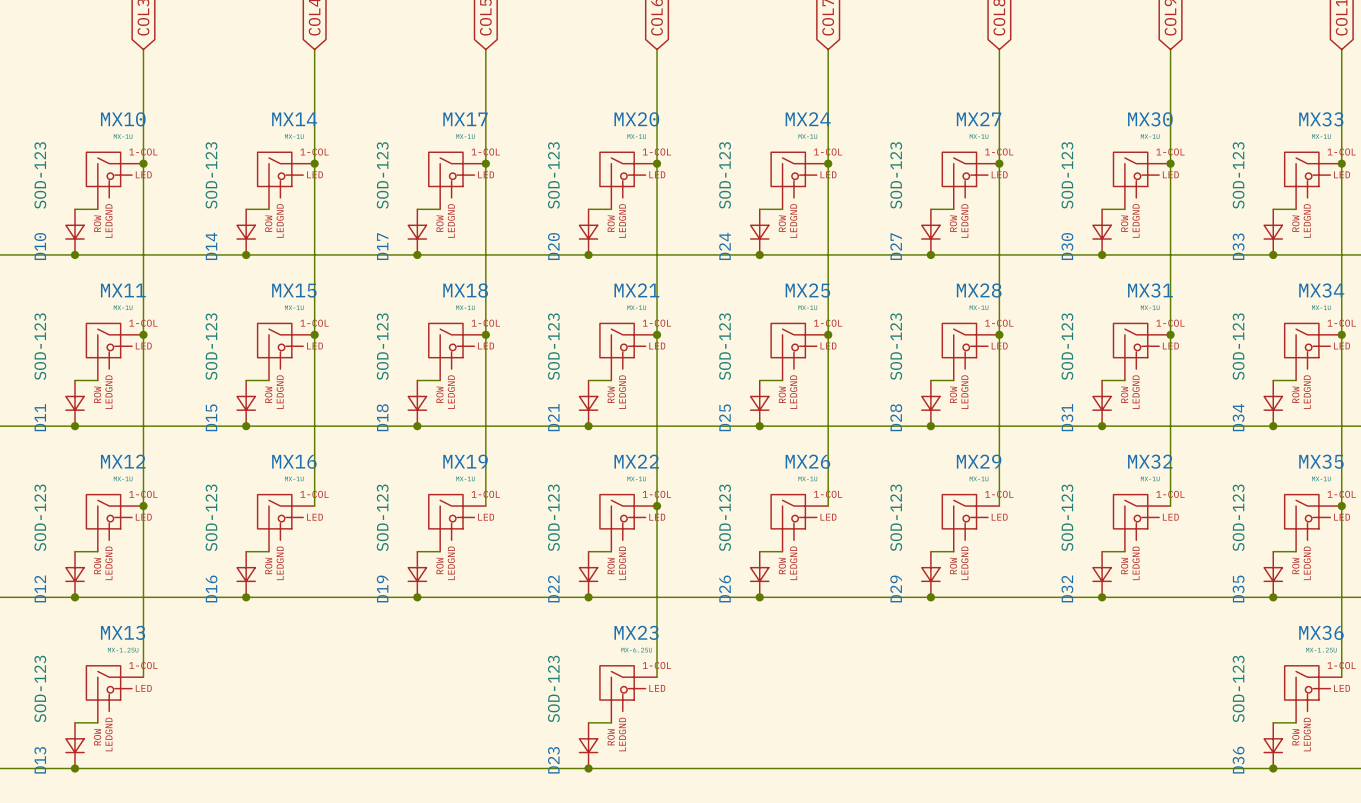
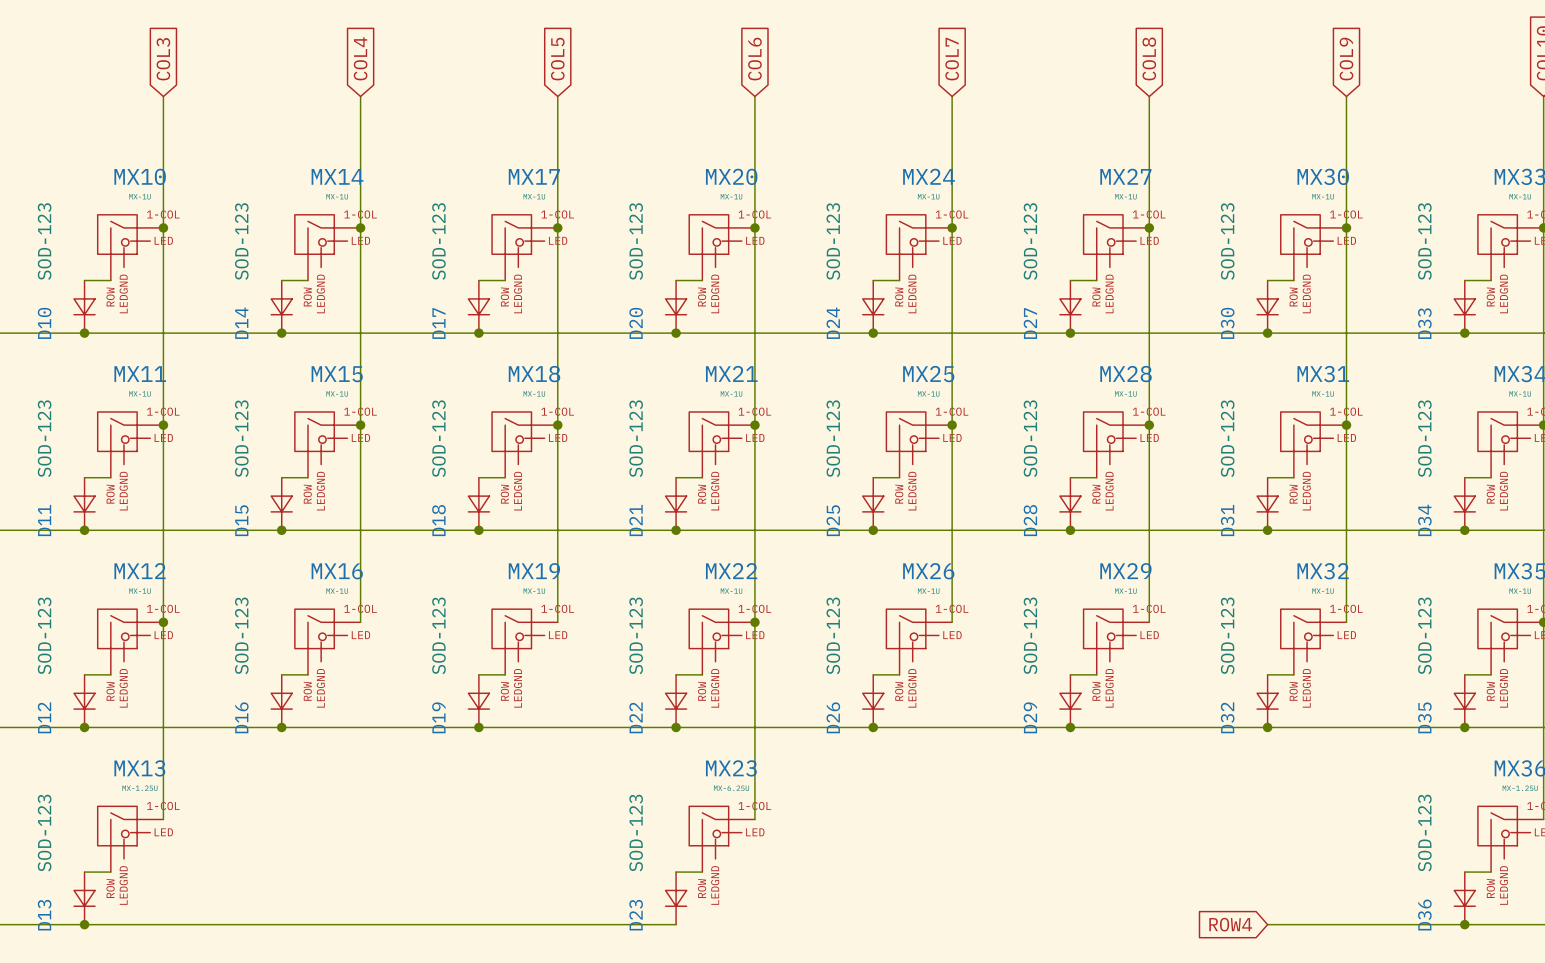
wire: (588, 768) (1102, 768) -> none
junction: (588, 768) -> none
global label: none -> ROW4 (1230, 924)

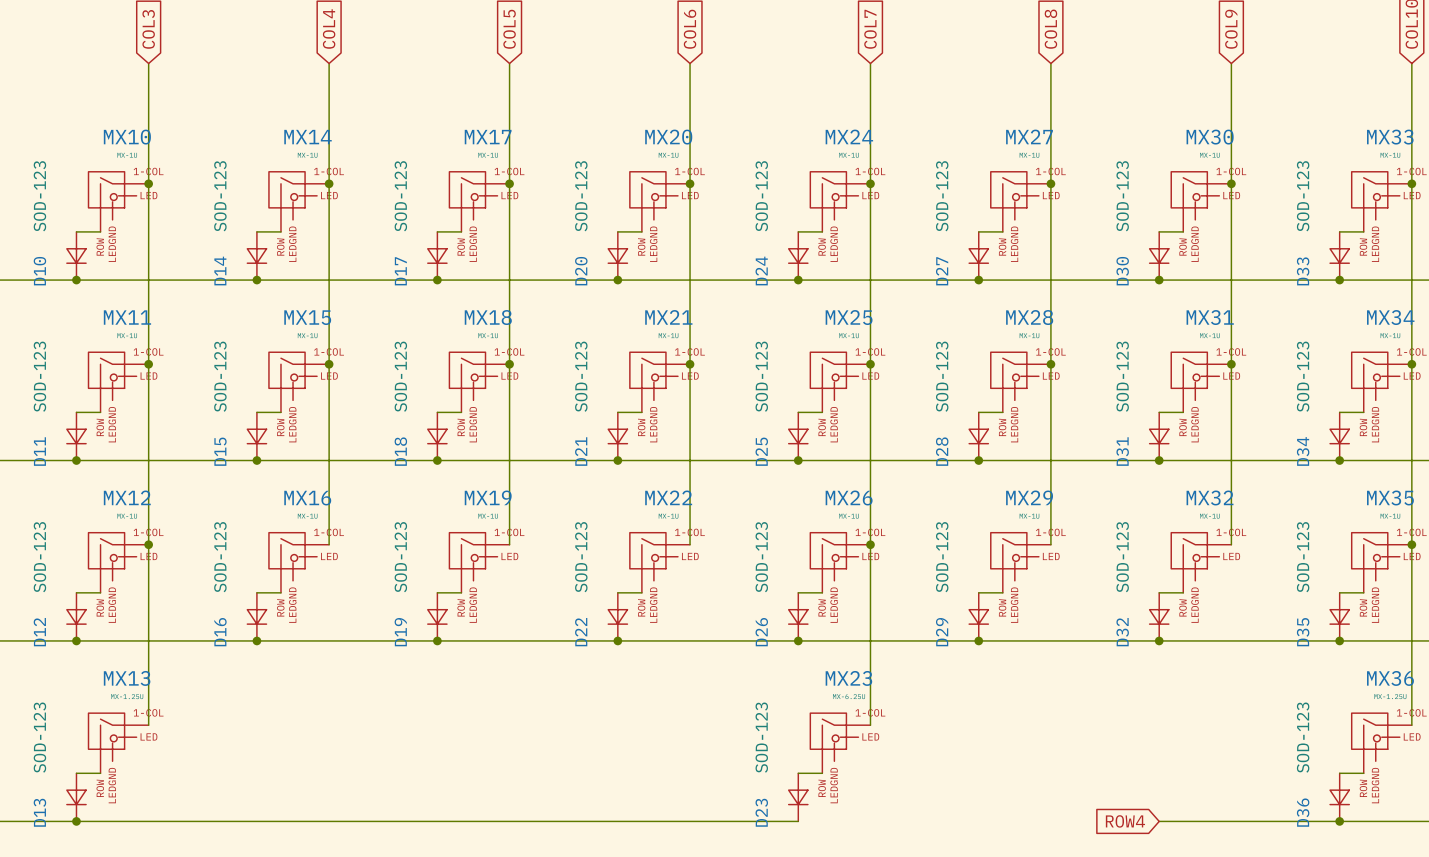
wire: (754, 622) (754, 819) -> (870, 544) (870, 725)
junction: (754, 622) -> none
junction: none -> (870, 544)
MX23 position: (721, 838) -> (840, 742)
wire: (676, 872) (702, 872) -> (798, 773) (822, 773)
D23 position: (676, 898) -> (798, 797)
wire: none -> (617, 821) (798, 821)

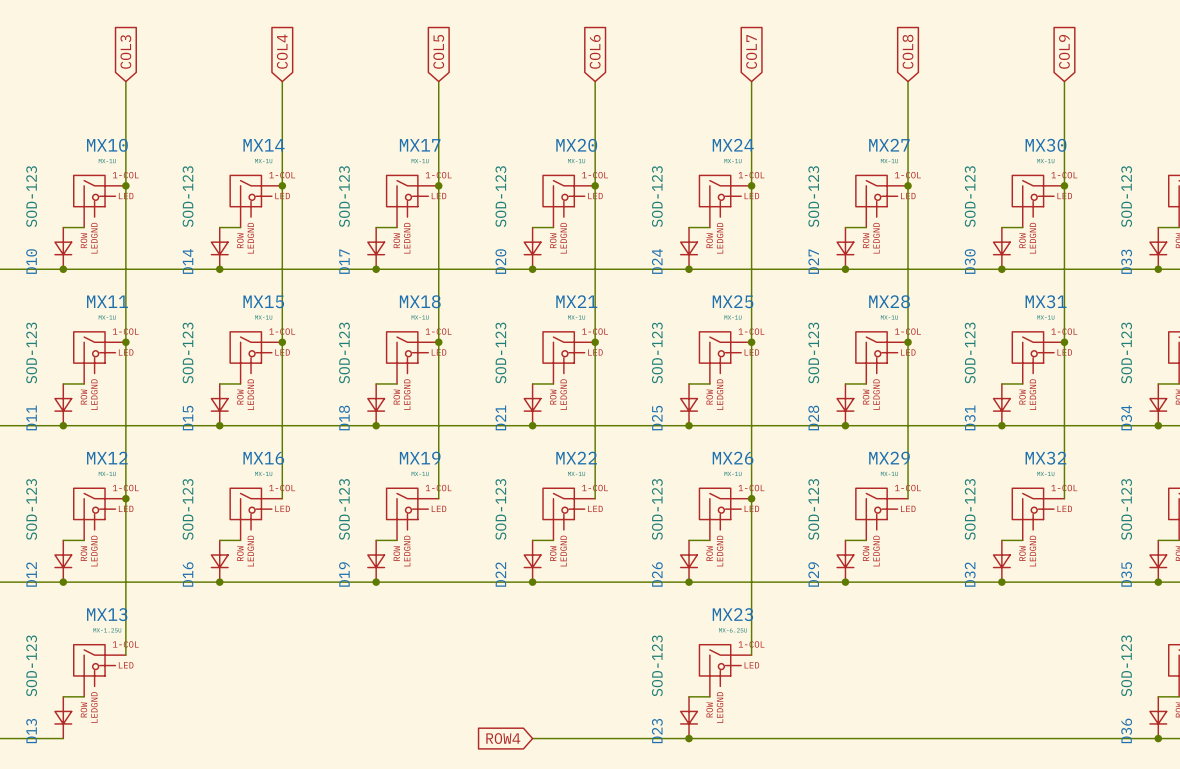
wire: (76, 821) (617, 821) -> none
junction: (76, 821) -> none
global label: none -> ROW4 (503, 738)
wire: none -> (689, 738) (1001, 738)
junction: none -> (689, 738)
global label: ROW4 (1125, 821) -> none

